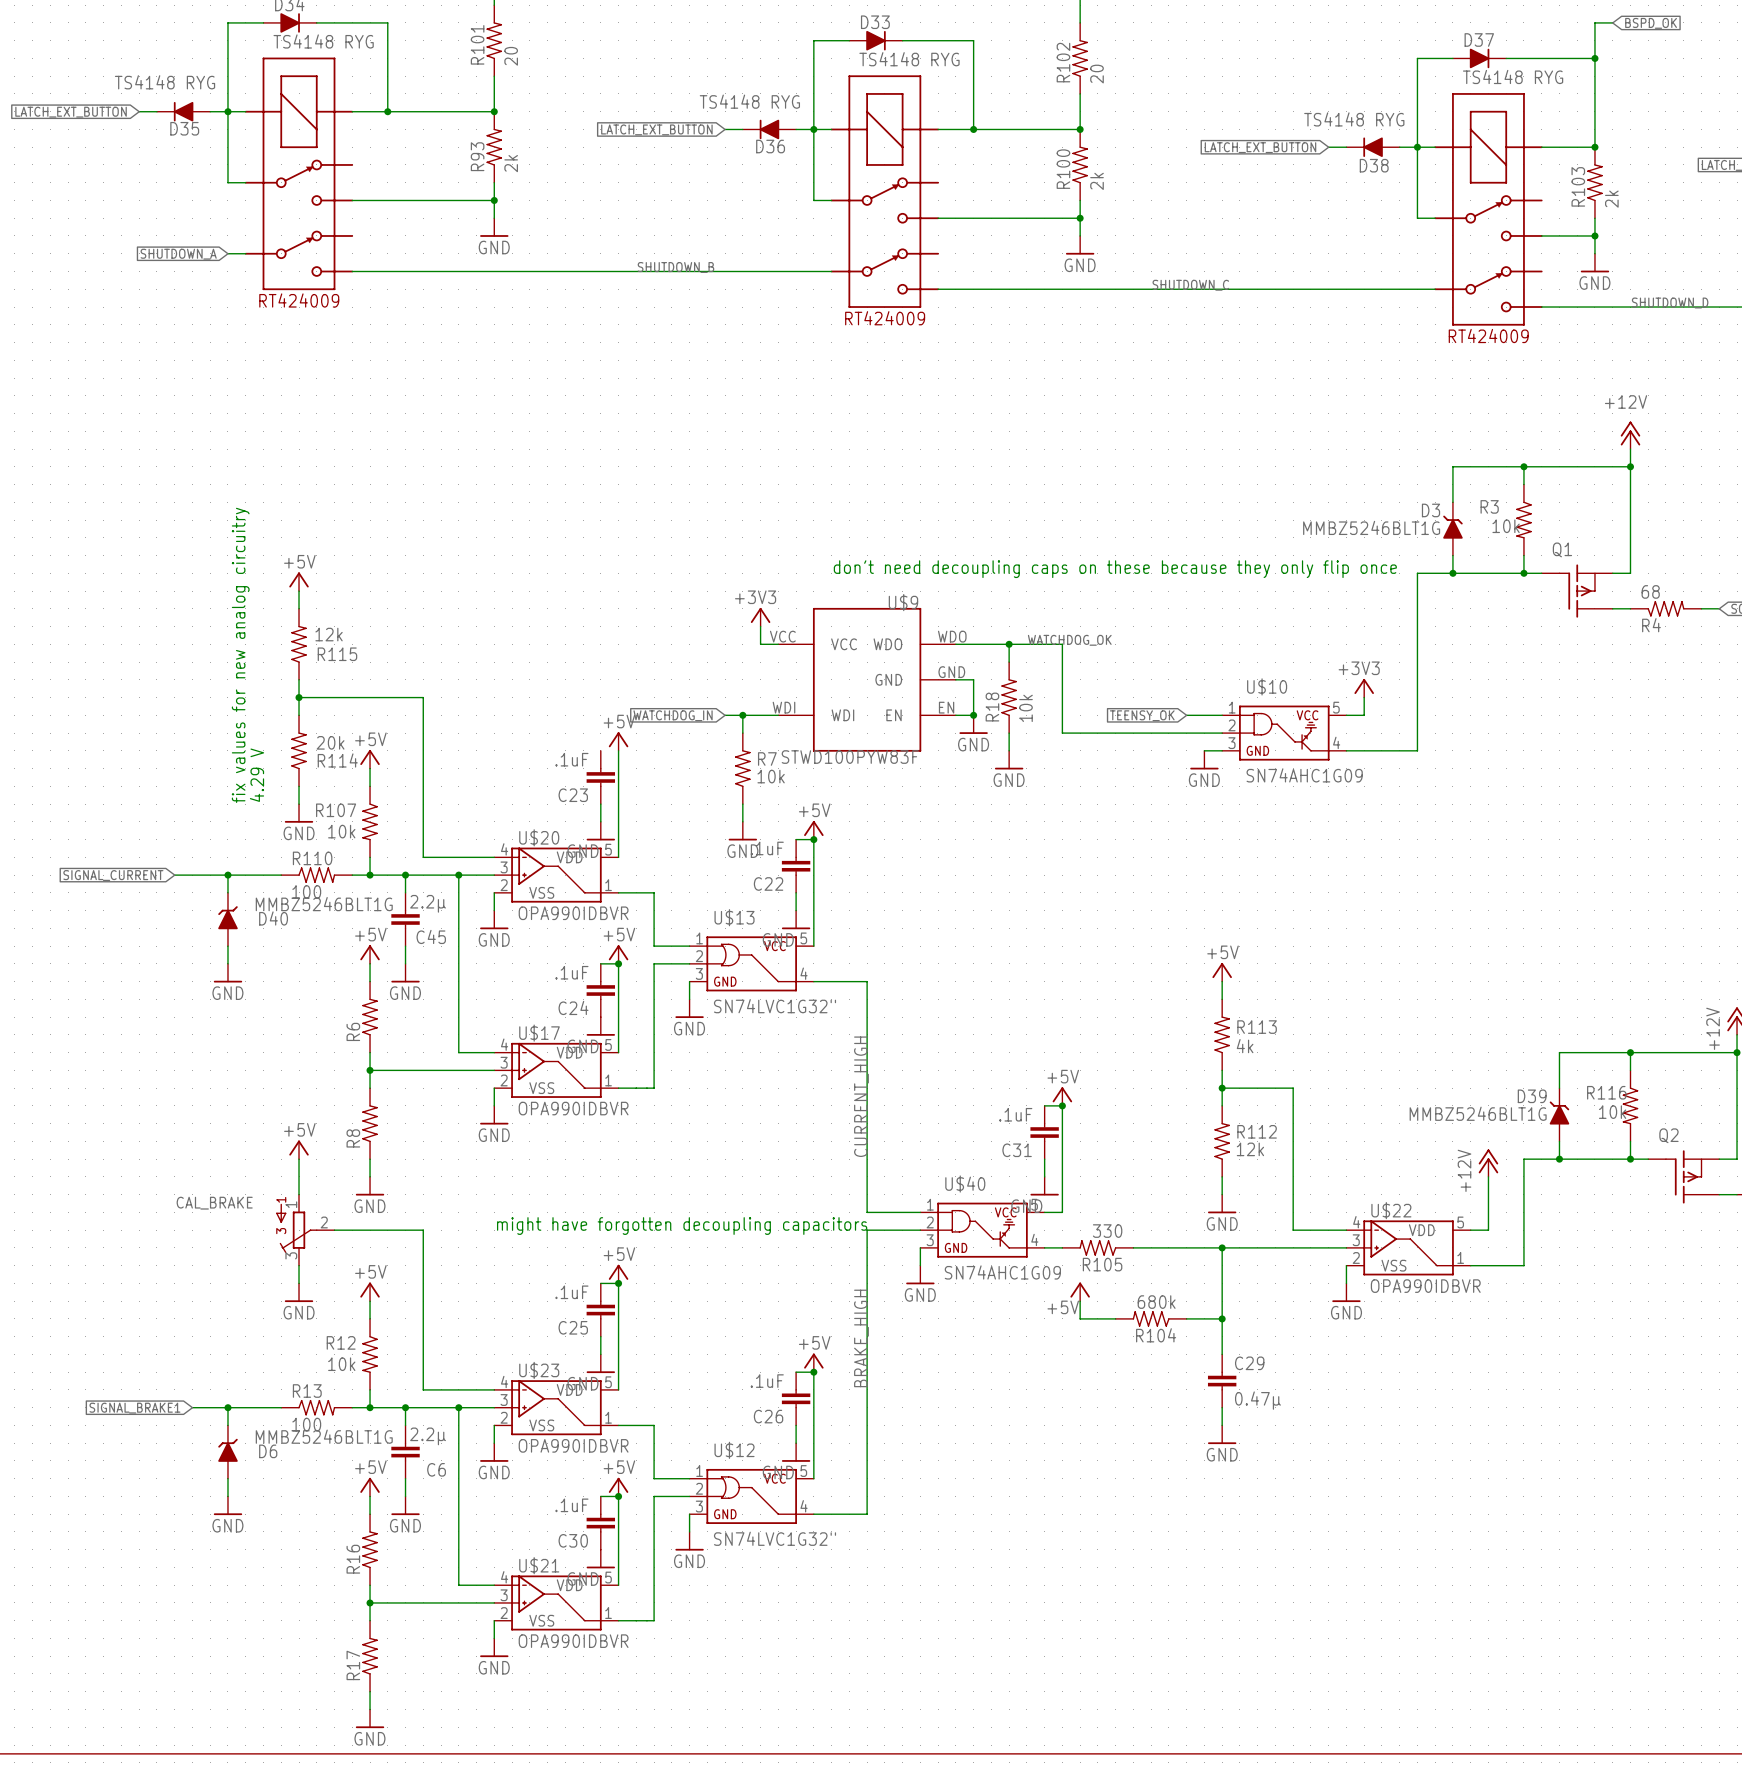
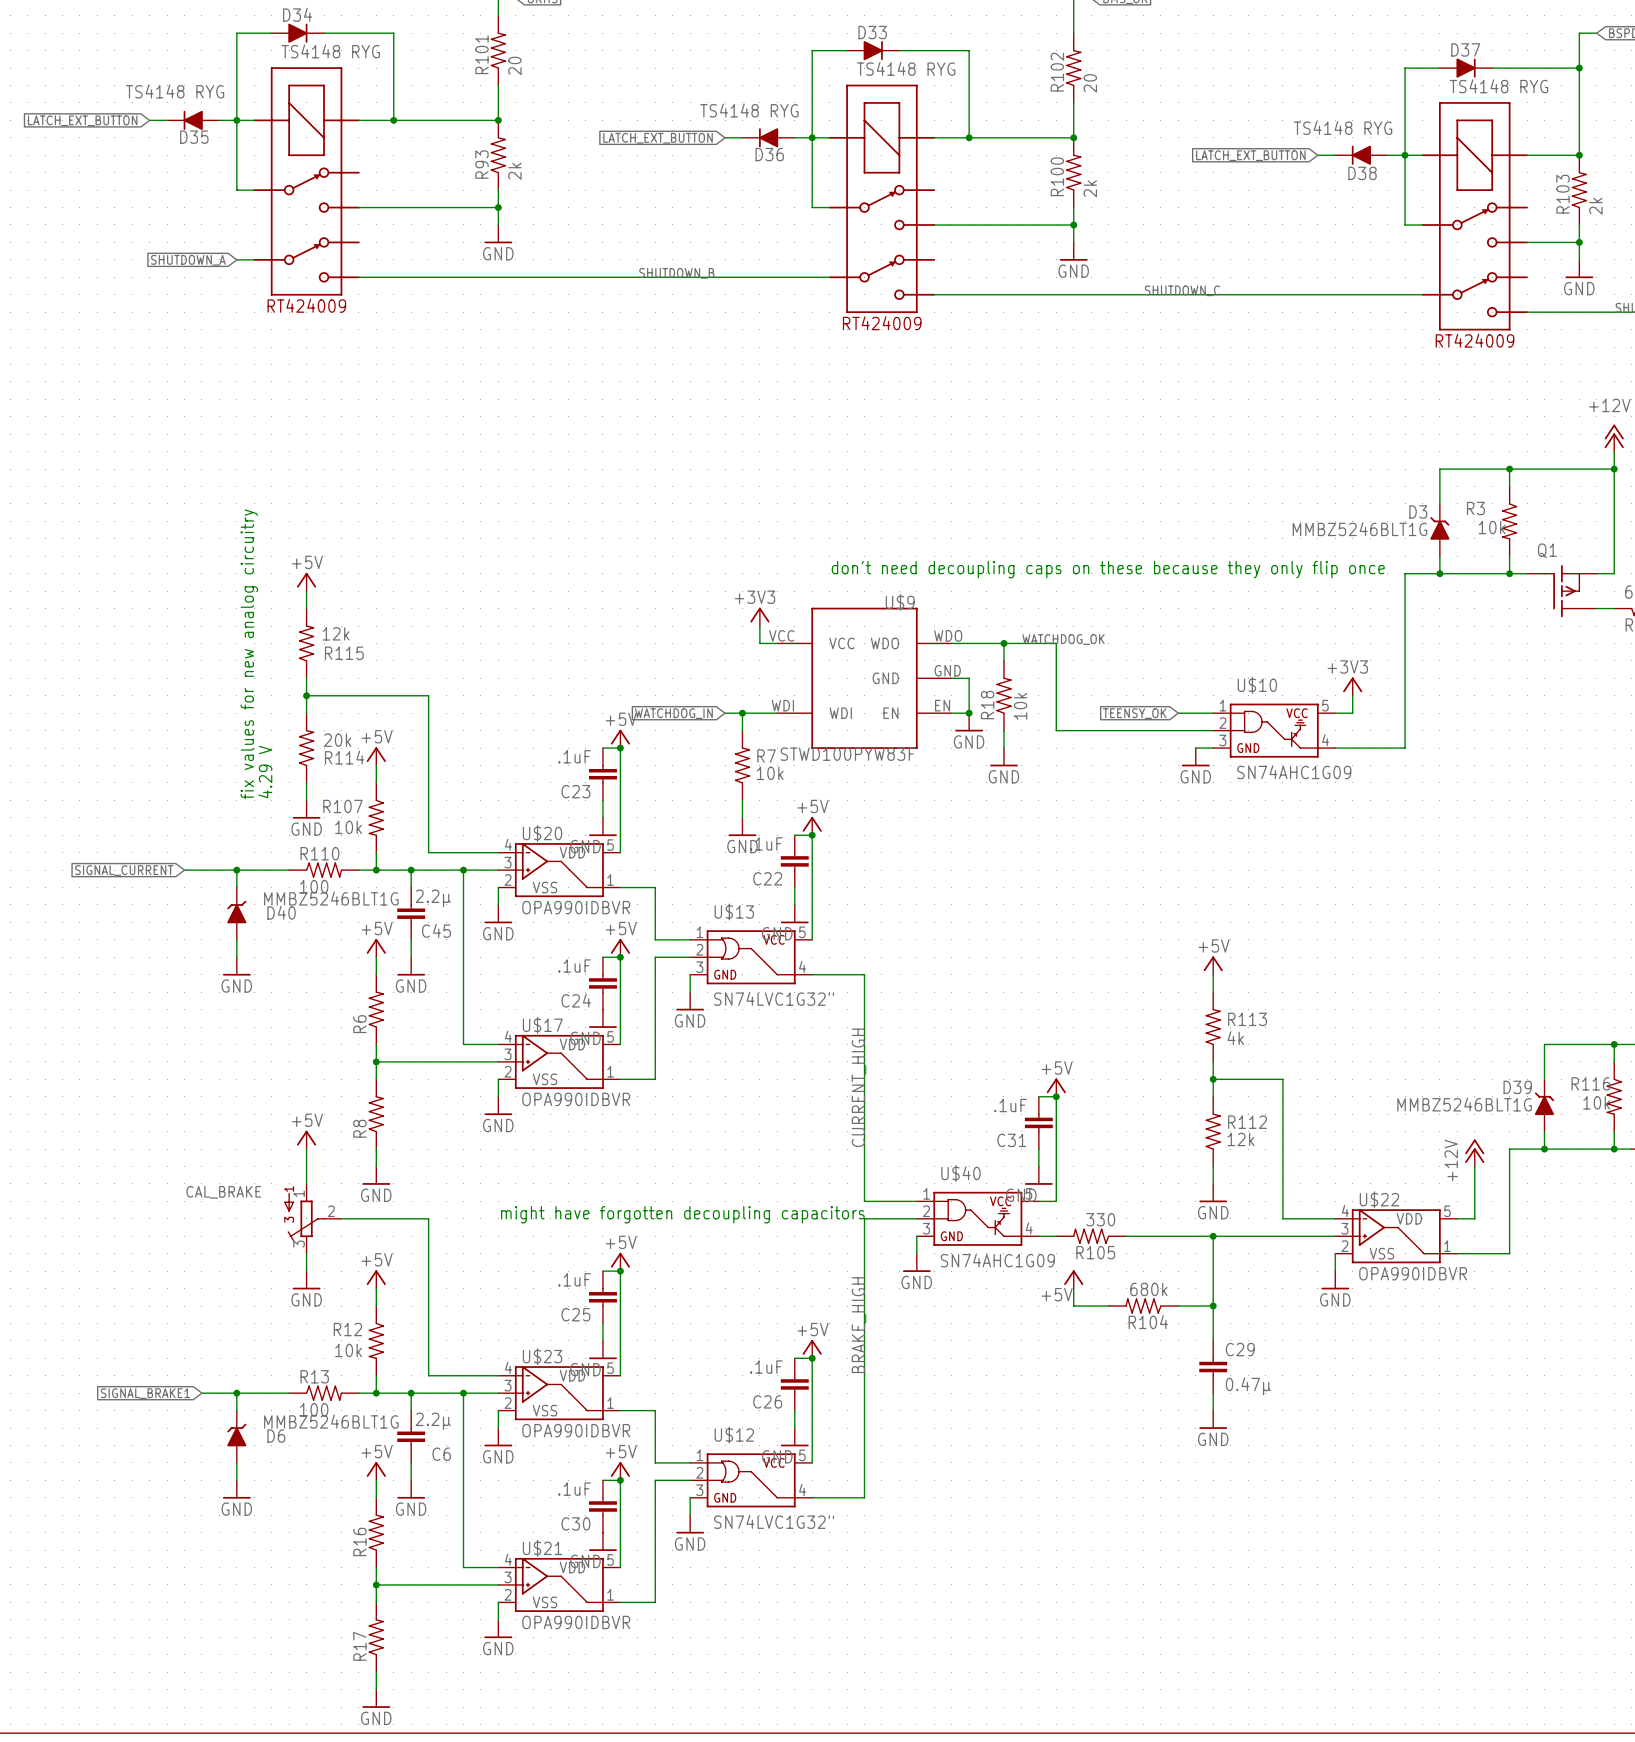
wire: none -> (602, 748) (620, 748)
junction: none -> (620, 748)

